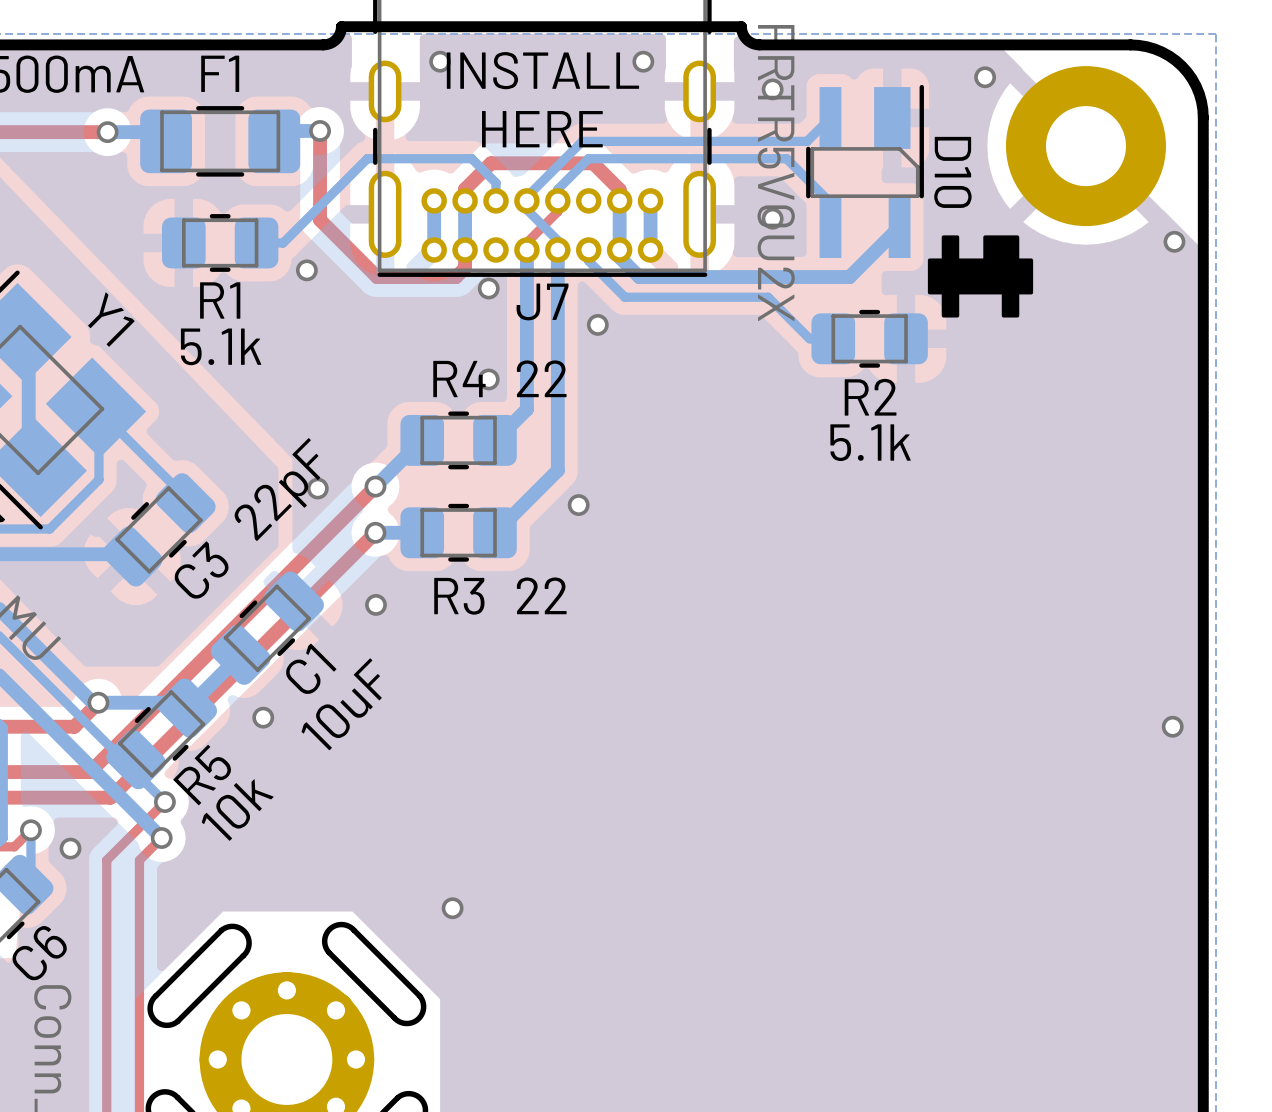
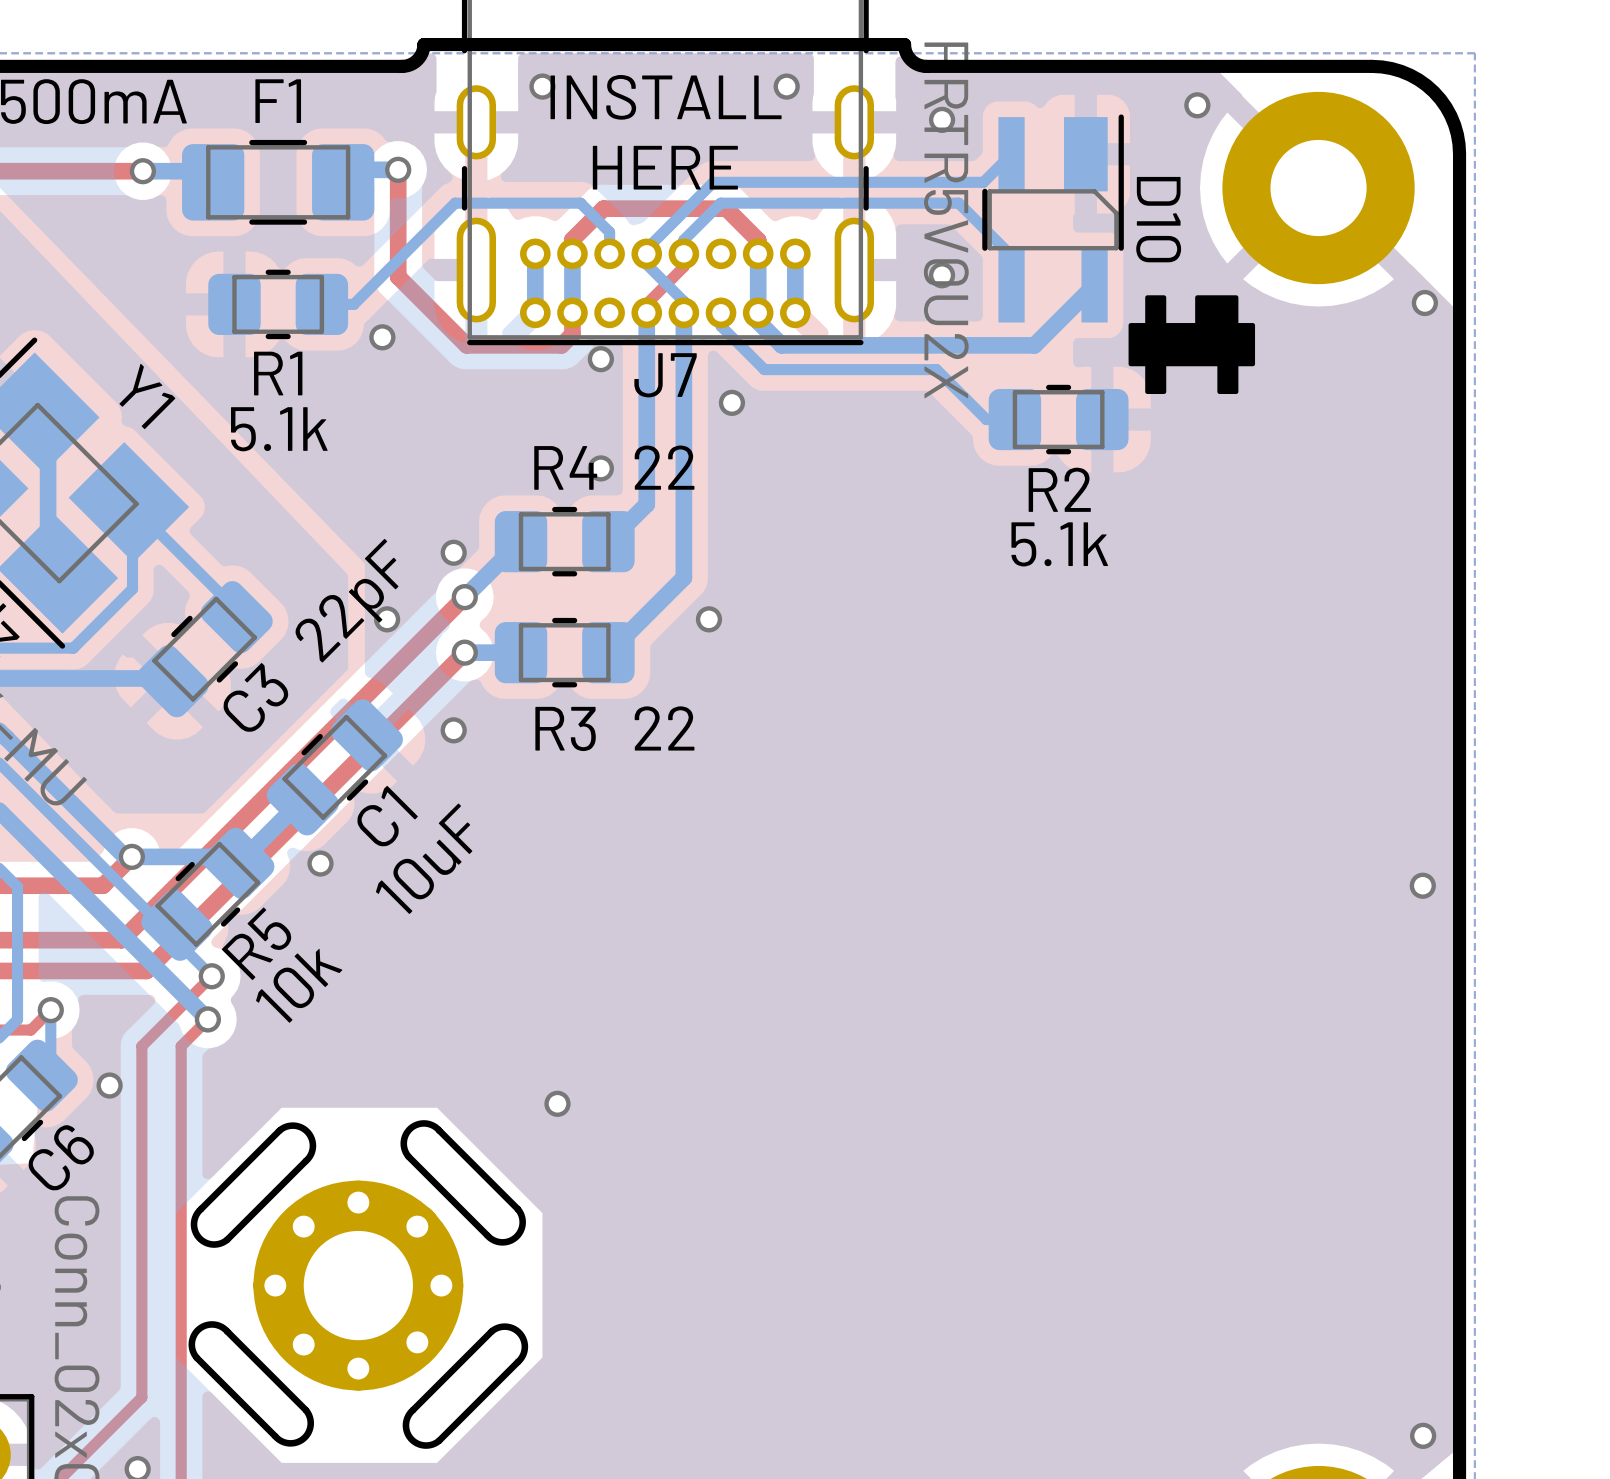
via: none -> (453, 552)
via position: (317, 488) -> (387, 619)
via position: (375, 604) -> (453, 730)
via position: (263, 717) -> (320, 863)
via position: (70, 848) -> (109, 1085)

